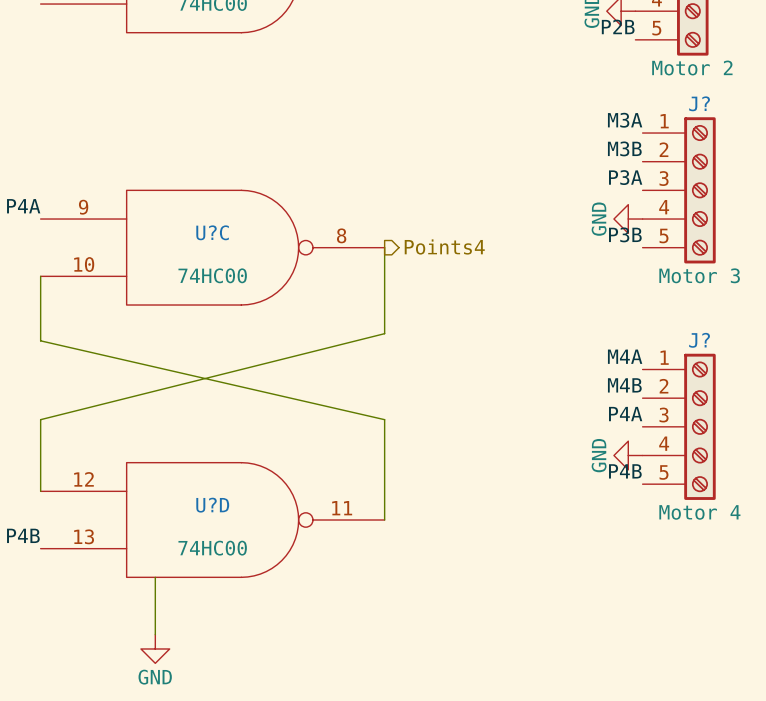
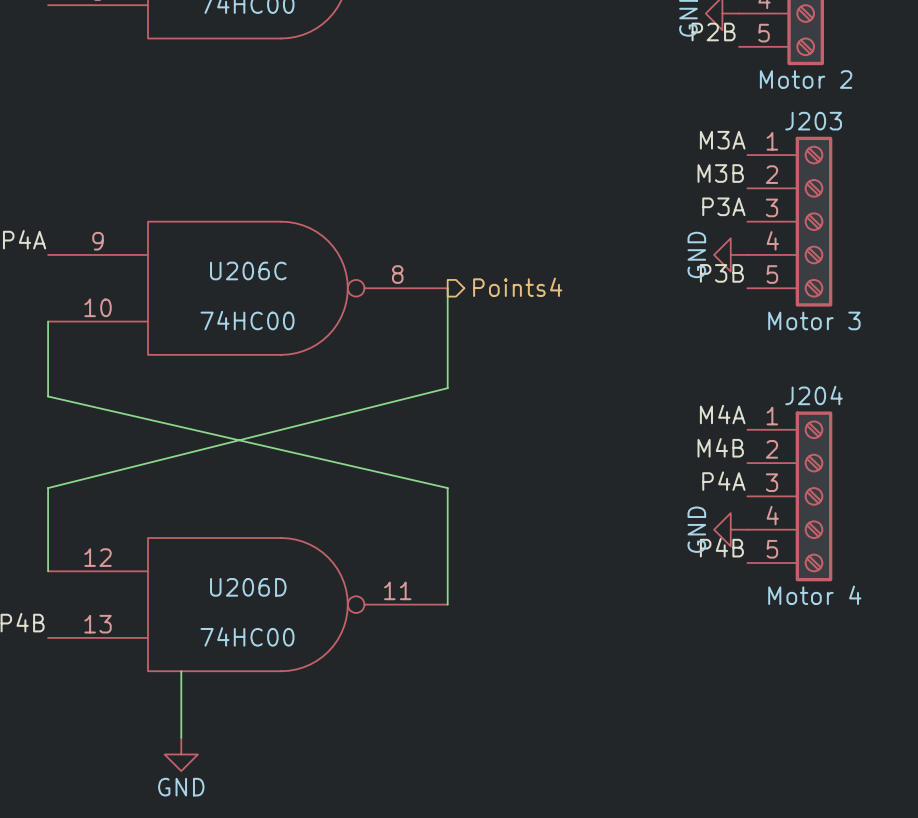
J? name: J? (699, 103) -> J203 (813, 121)
U?C name: U?C (212, 232) -> U206C (248, 270)
J? name: J? (699, 340) -> J204 (814, 395)
U?D name: U?D (212, 505) -> U206D (248, 587)

